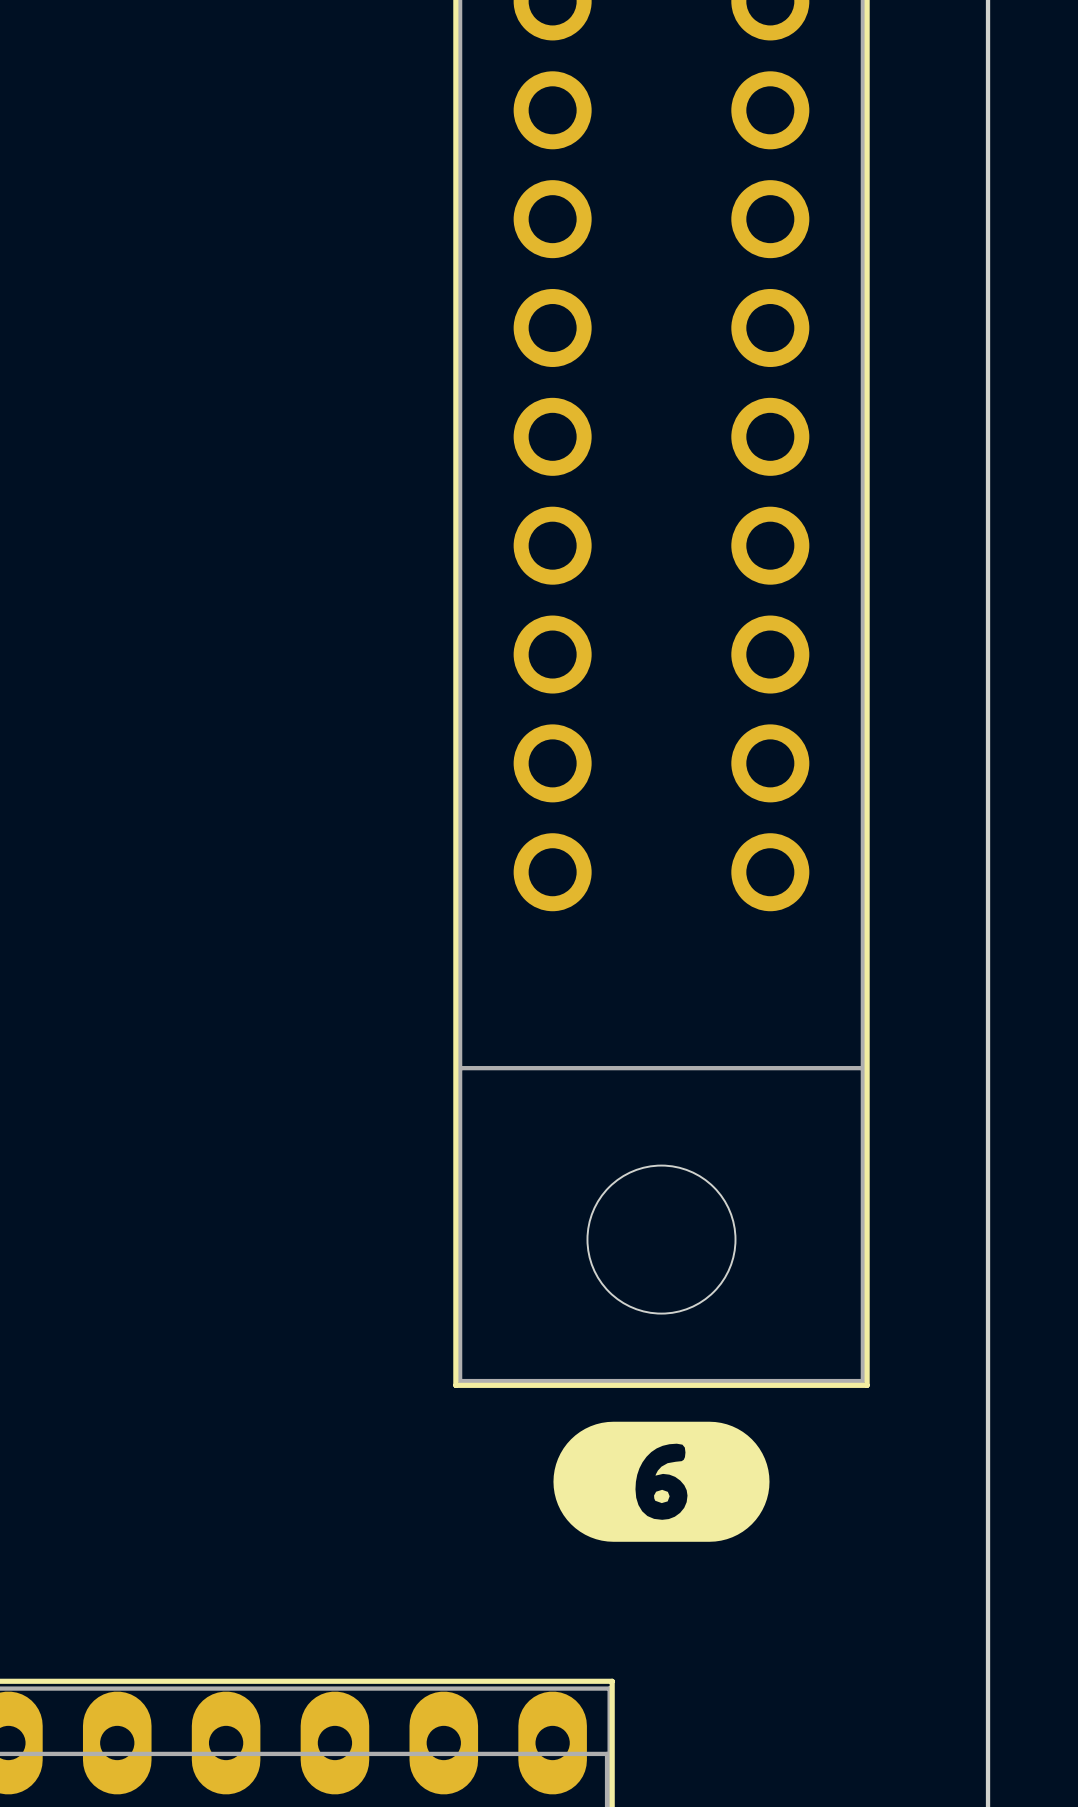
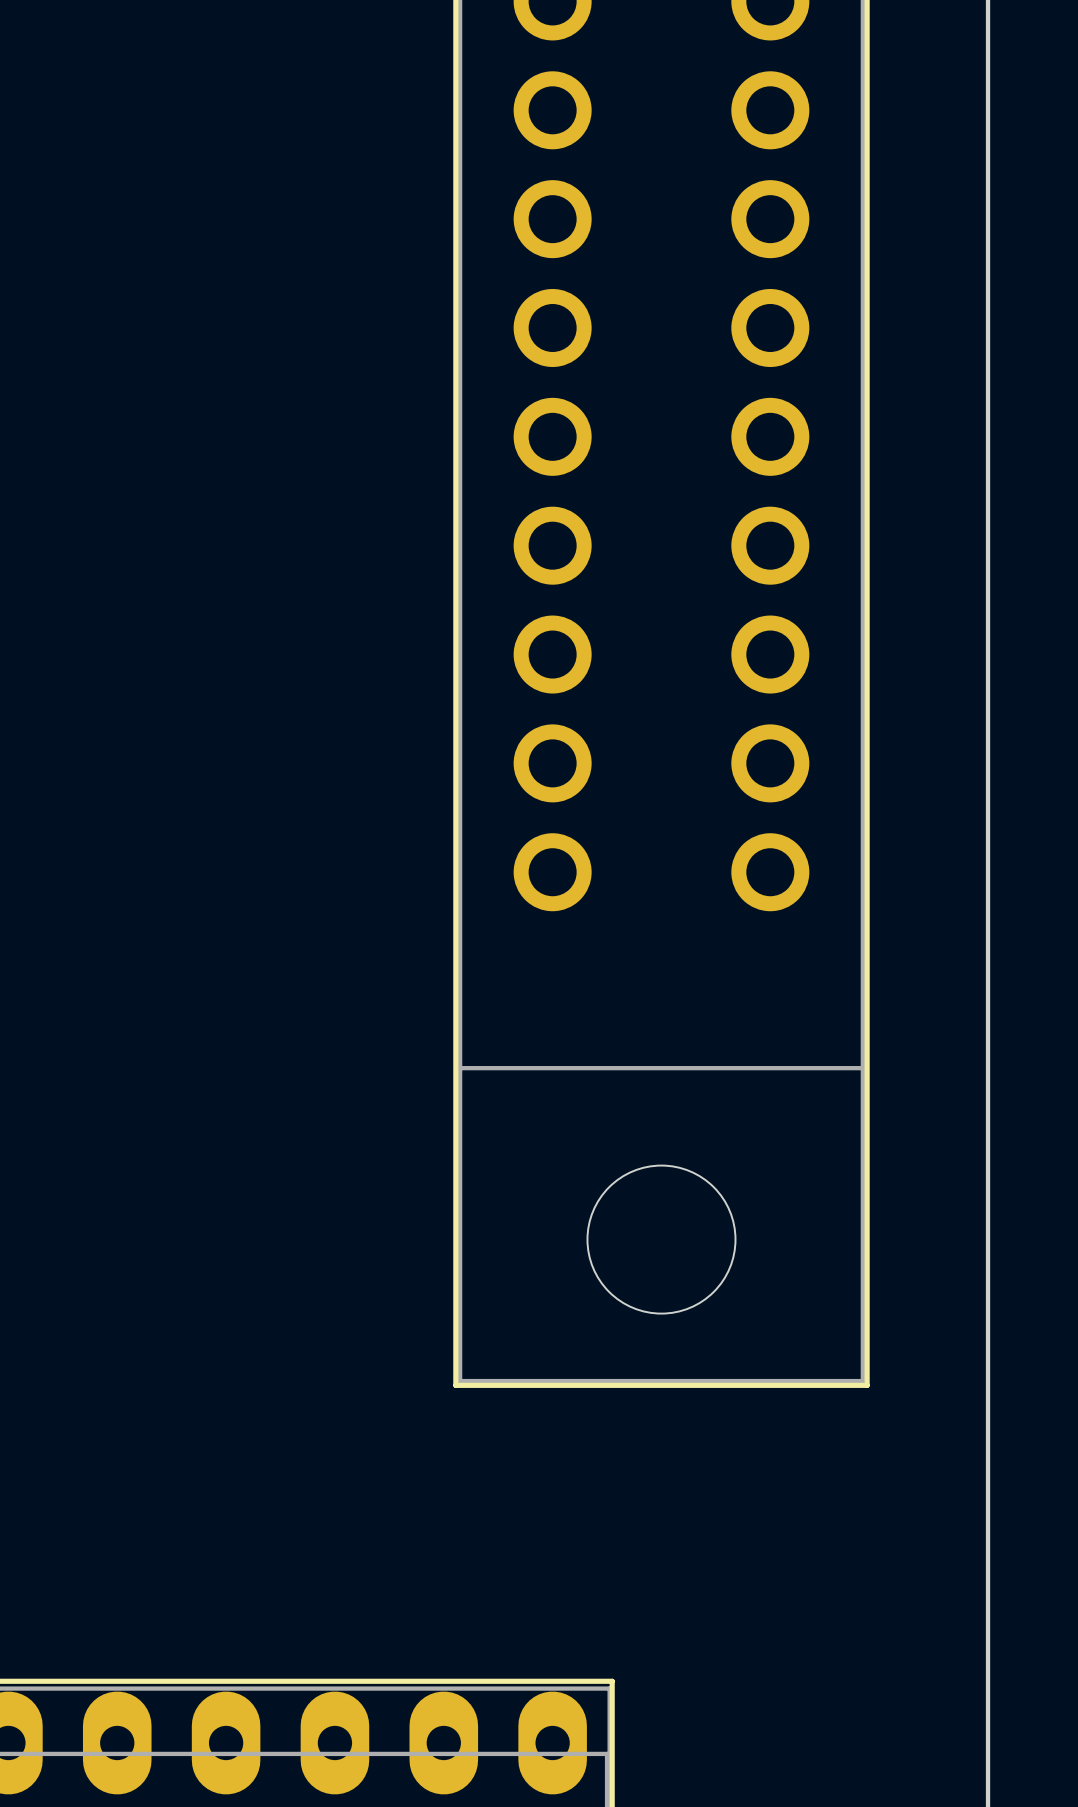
drawing: [553, 1421, 770, 1542] -> none

